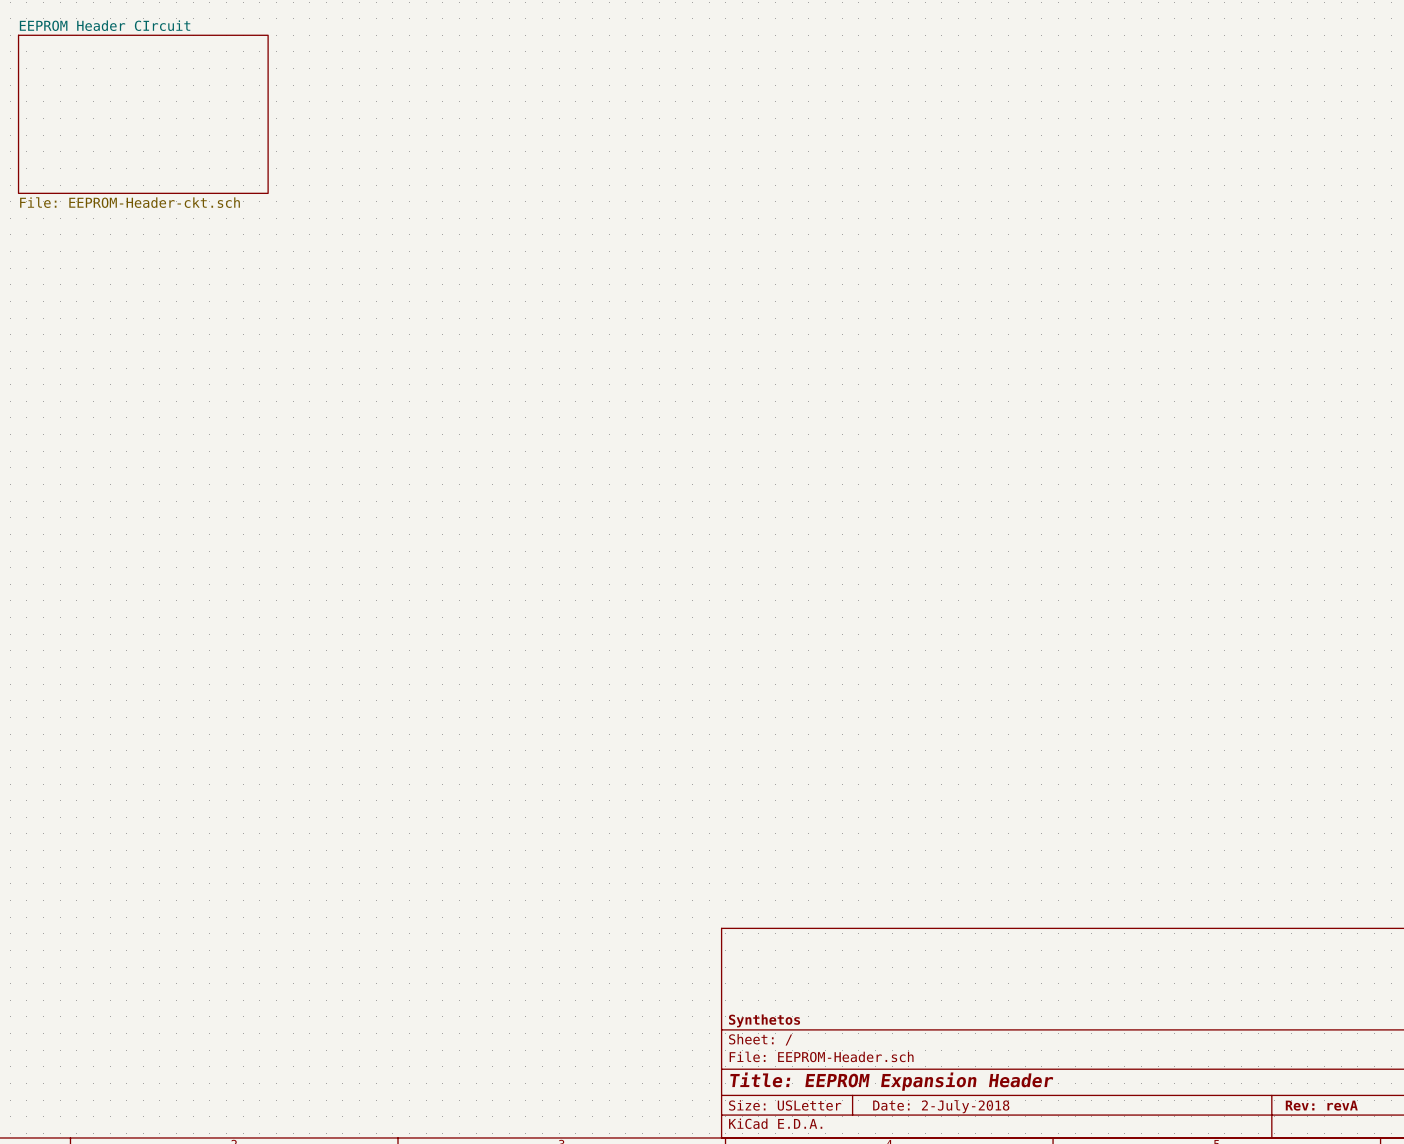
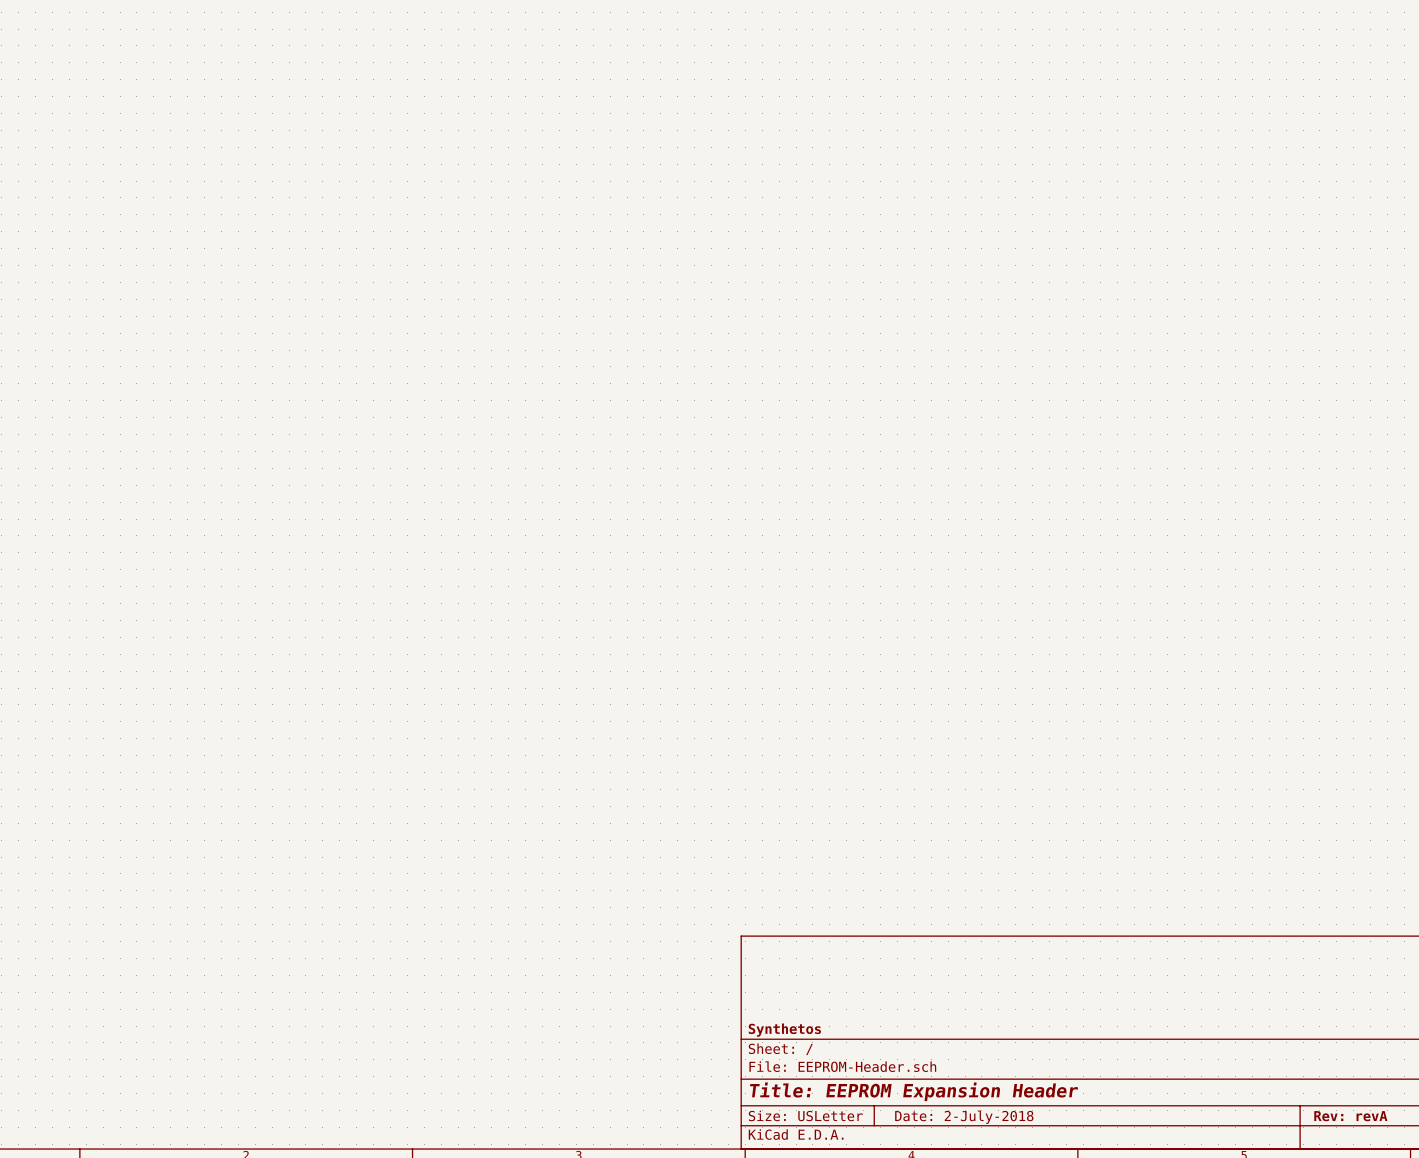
sheet EEPROM Header CIrcuit: File: EEPROM-Header-ckt.sch (143, 114) -> none

